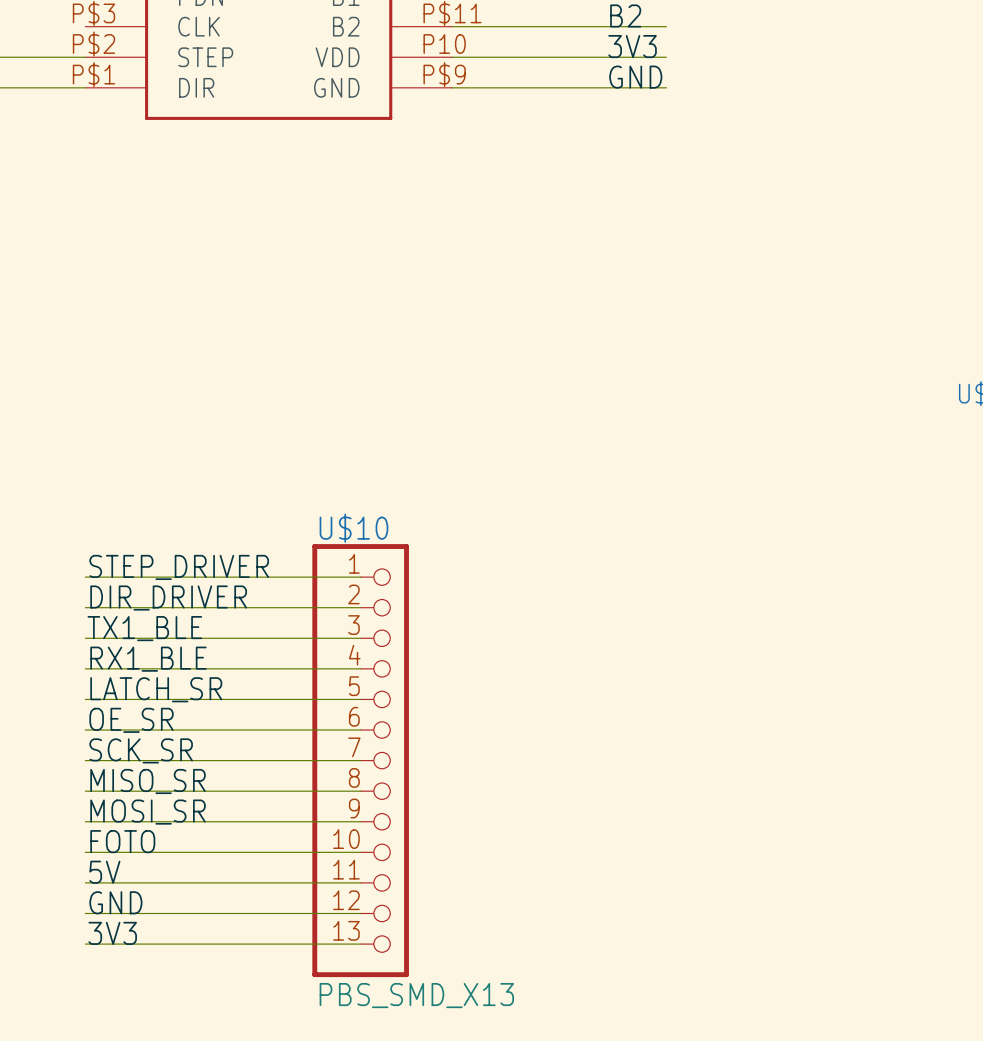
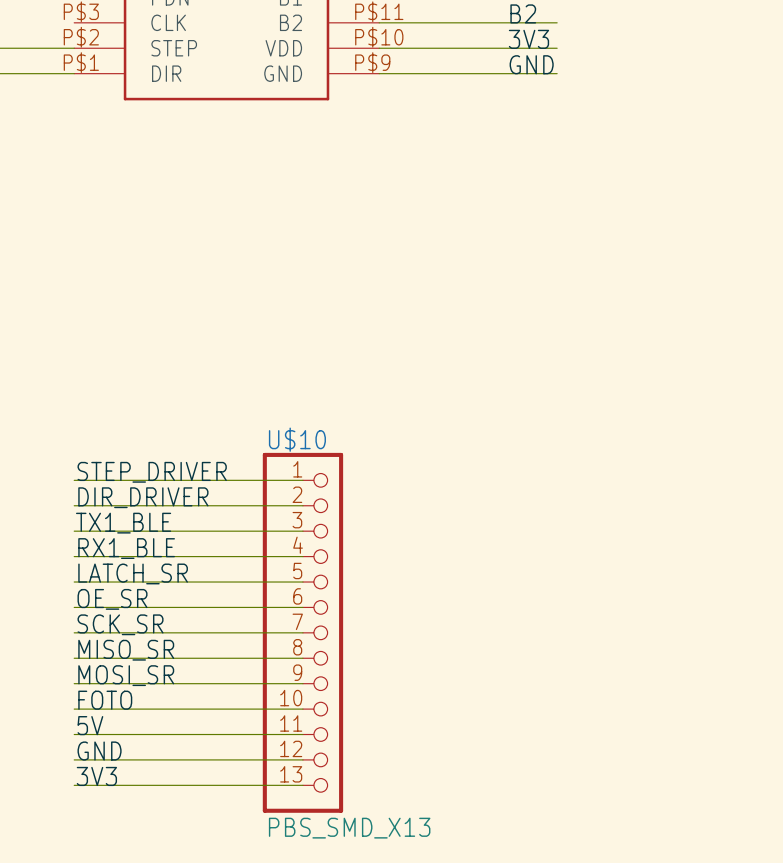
part pin number: P10 (444, 44) -> P$10 (379, 37)

